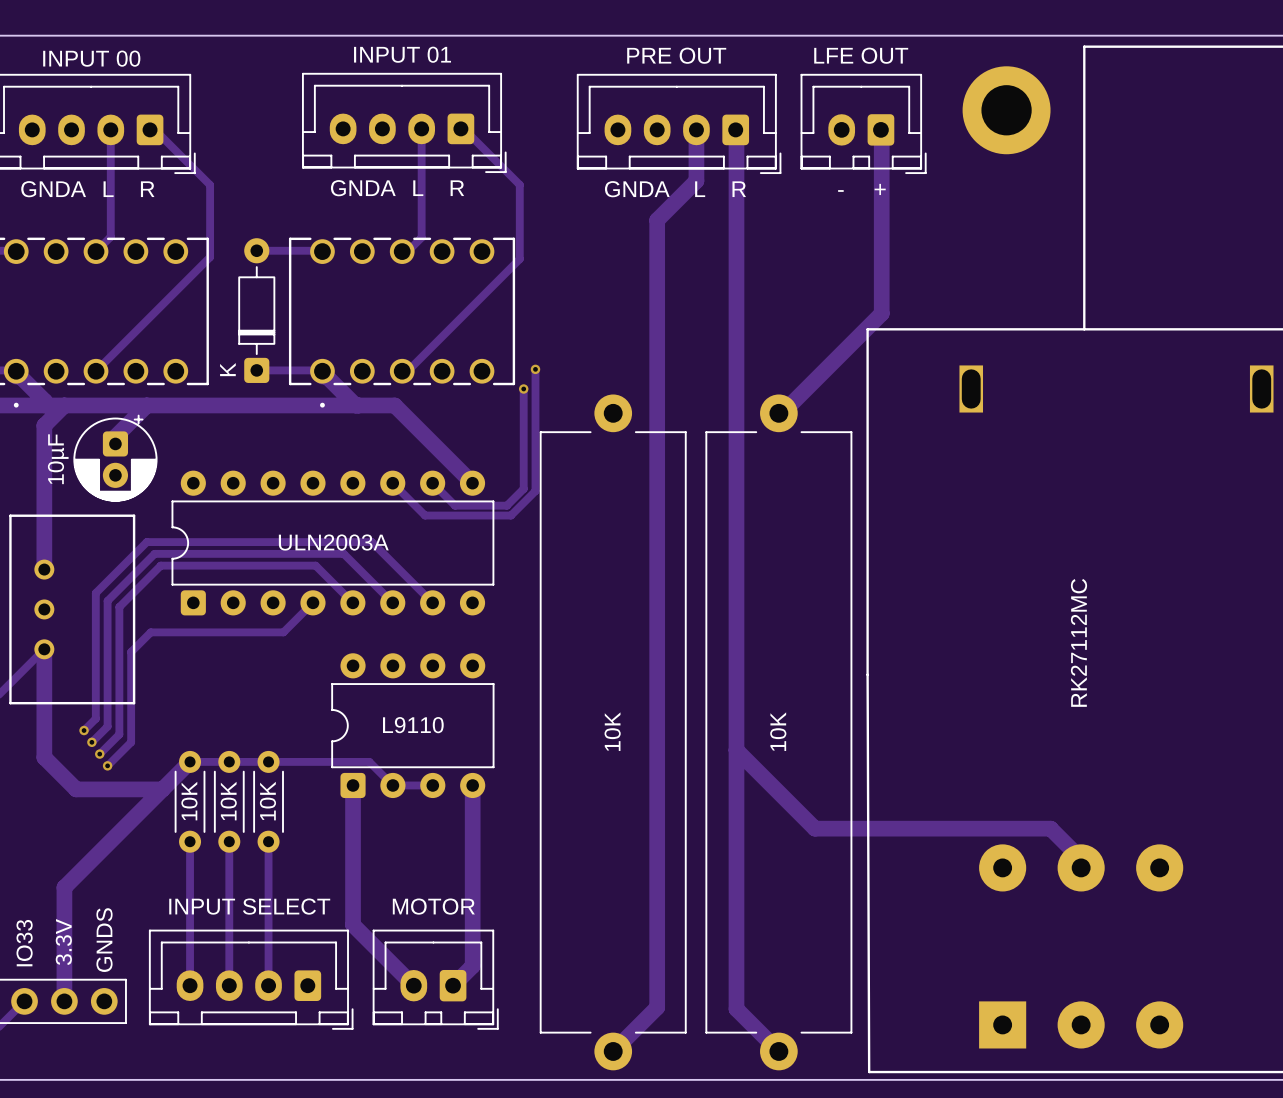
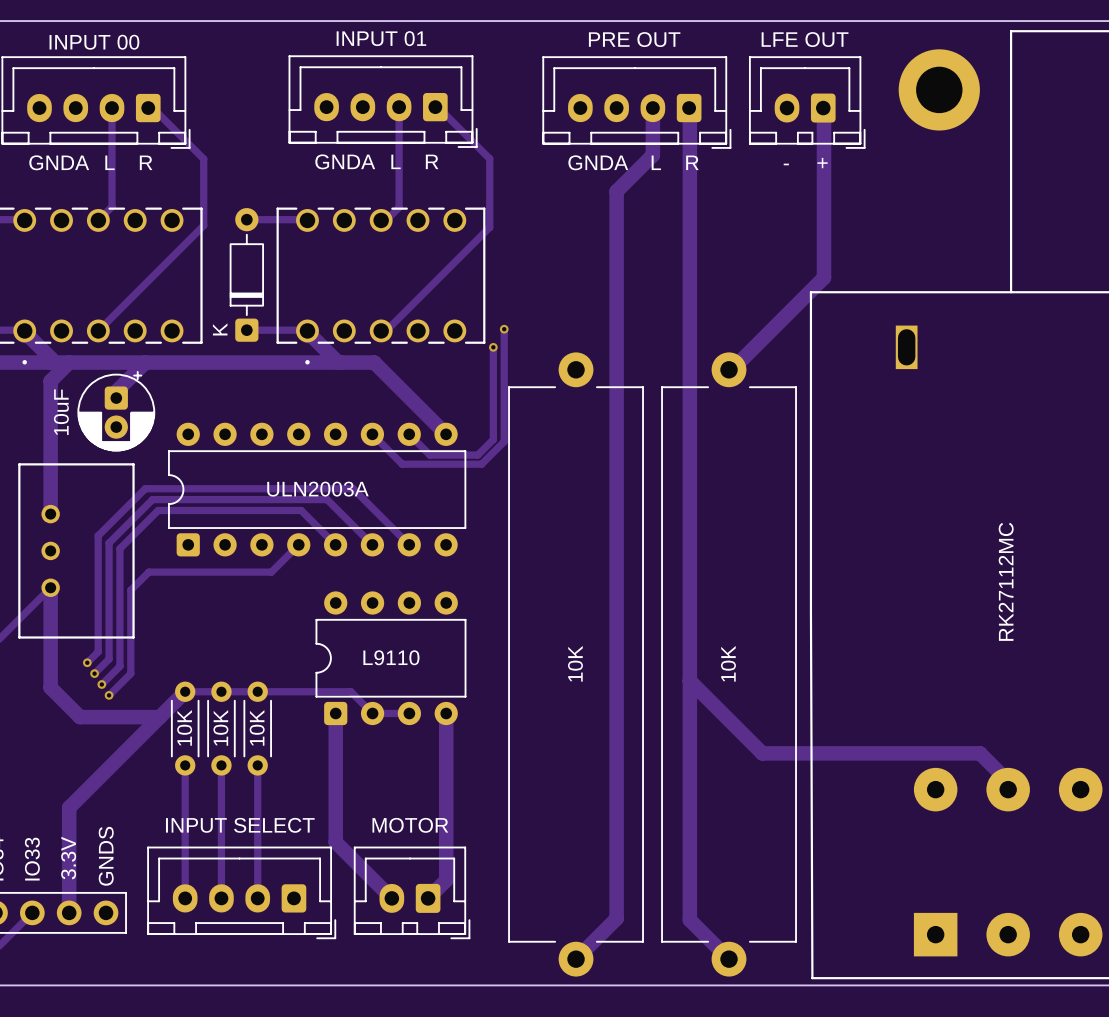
part value: 10µF (58, 459) -> 10uF (61, 412)

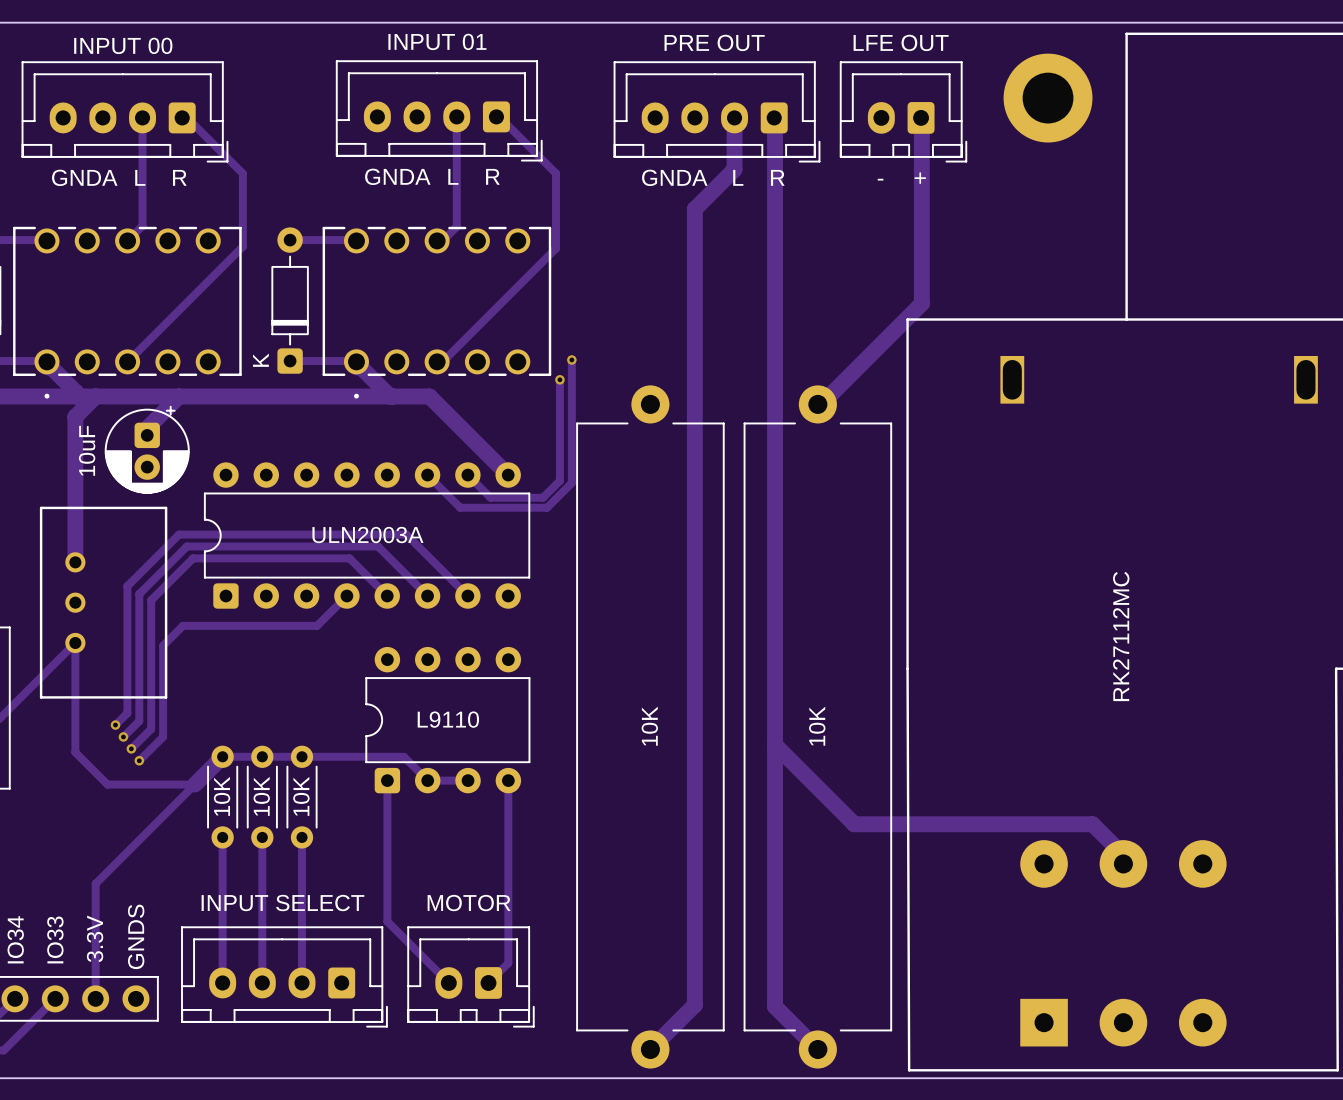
track width: thick (50, 587) (50, 687) (80, 717) (159, 717) (69, 807) (69, 912) -> thin (75, 642) (75, 752) (107, 784) (194, 784) (95, 883) (95, 998)
track width: thick (335, 713) (335, 842) (391, 898) -> thin (387, 780) (387, 921) (448, 982)
track width: thick (446, 713) (446, 880) (428, 898) -> thin (508, 780) (508, 963) (488, 982)

